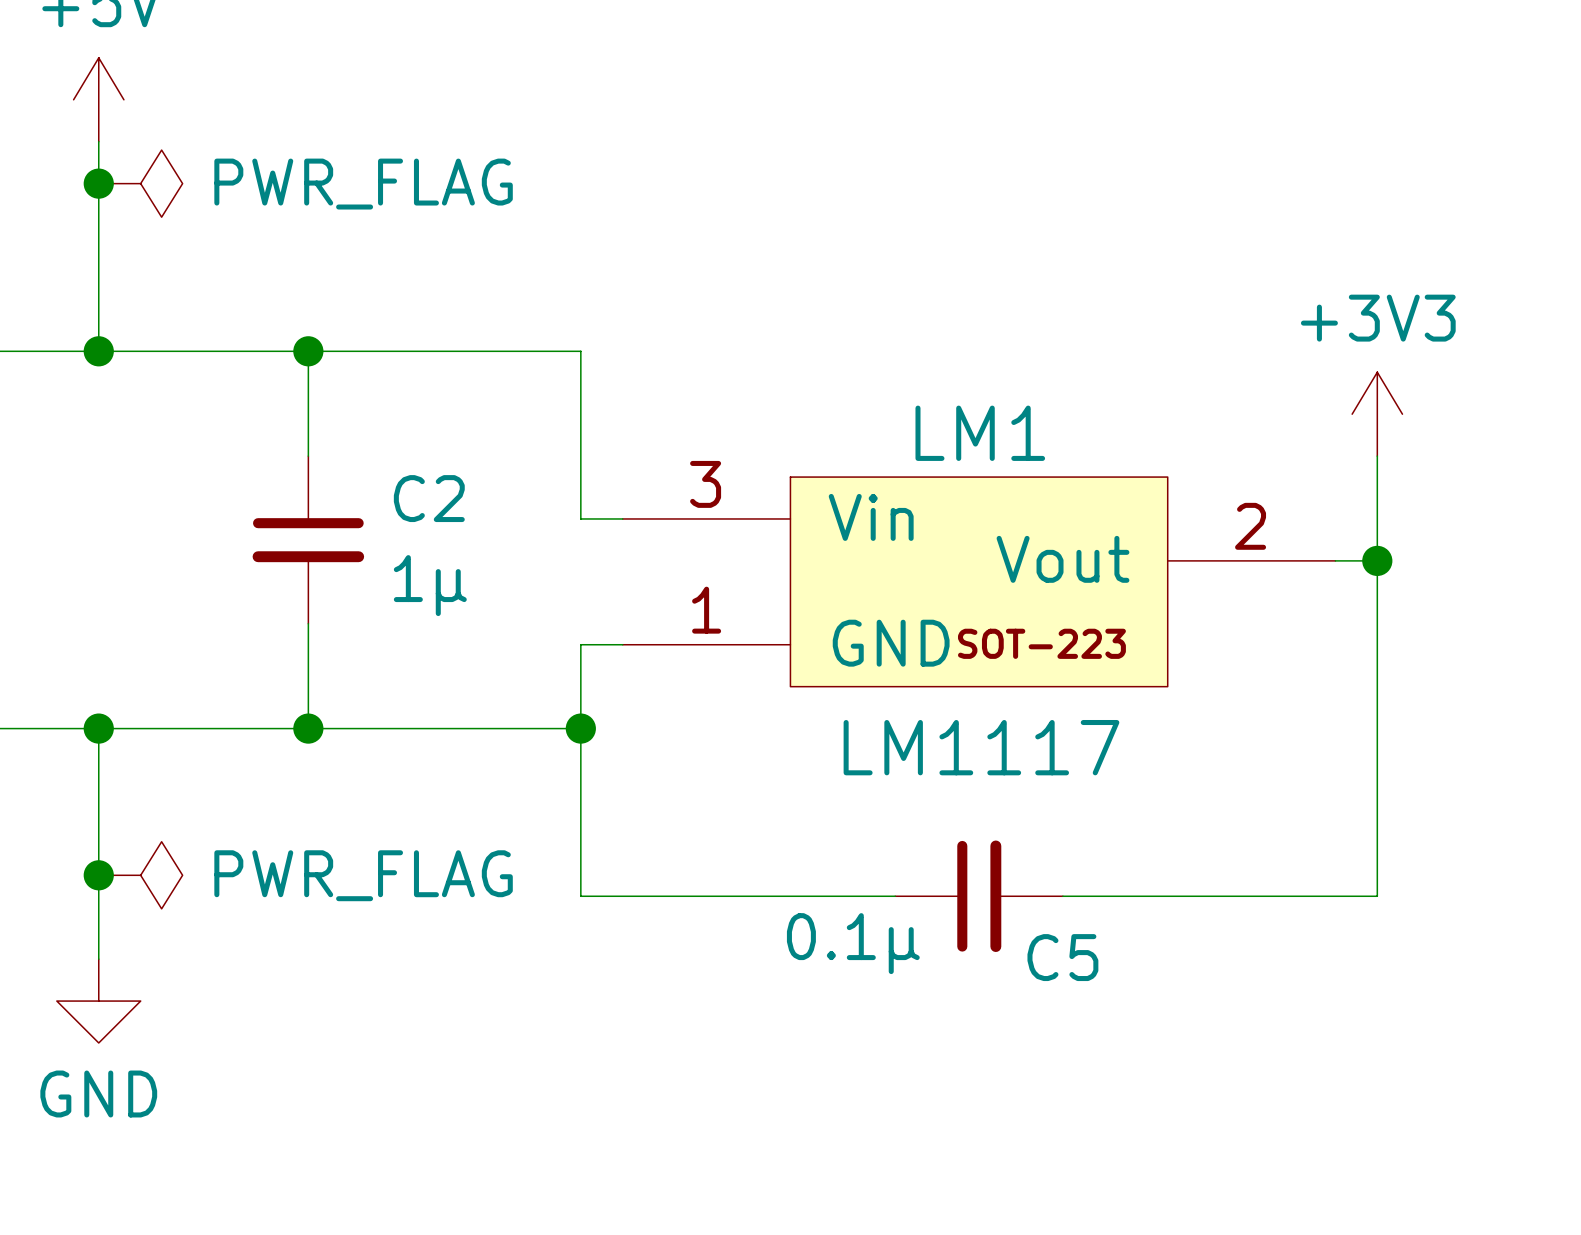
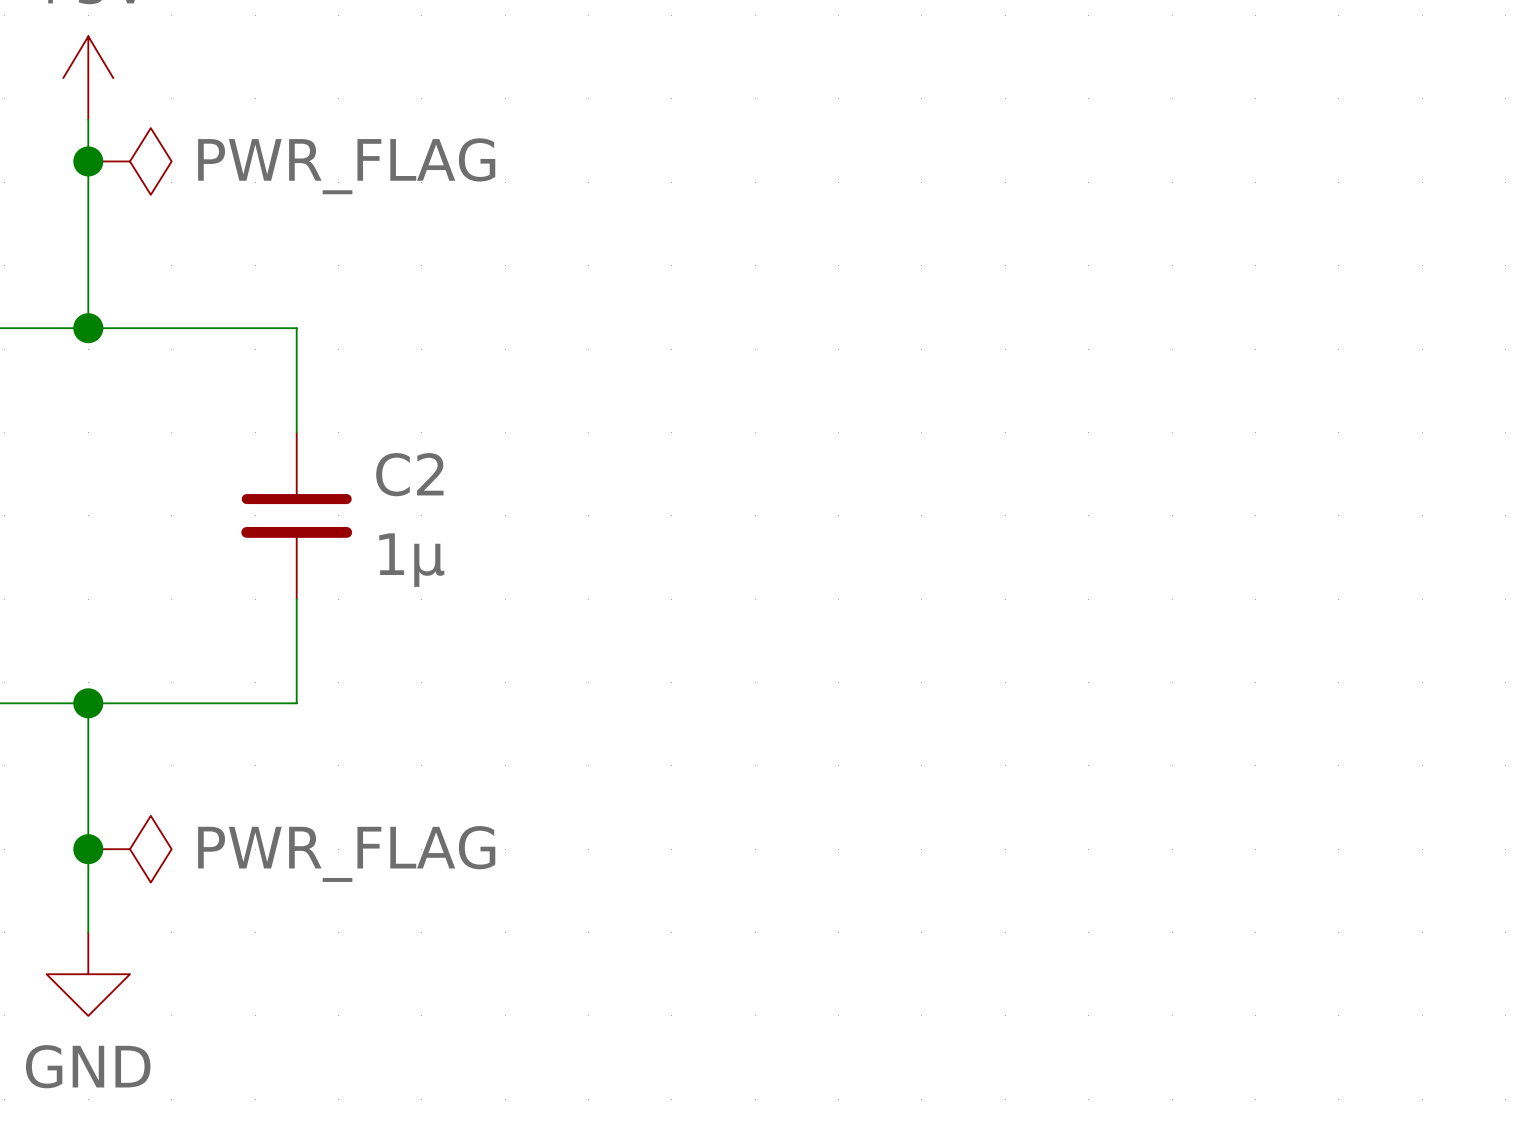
wire: (308, 351) (580, 351) (580, 518) (622, 518) -> none
junction: (308, 351) -> none
power symbol: +3V3 (1377, 414) -> none
wire: (1377, 456) (1377, 896) (1062, 896) -> none
wire: (1335, 560) (1377, 560) -> none
junction: (1377, 560) -> none
LM1: LM1117 (979, 581) -> none
wire: (622, 644) (580, 644) (580, 896) (895, 896) -> none
wire: (308, 728) (580, 728) -> none
junction: (308, 728) -> none
junction: (580, 728) -> none
C5: 0.1µ (979, 896) -> none

